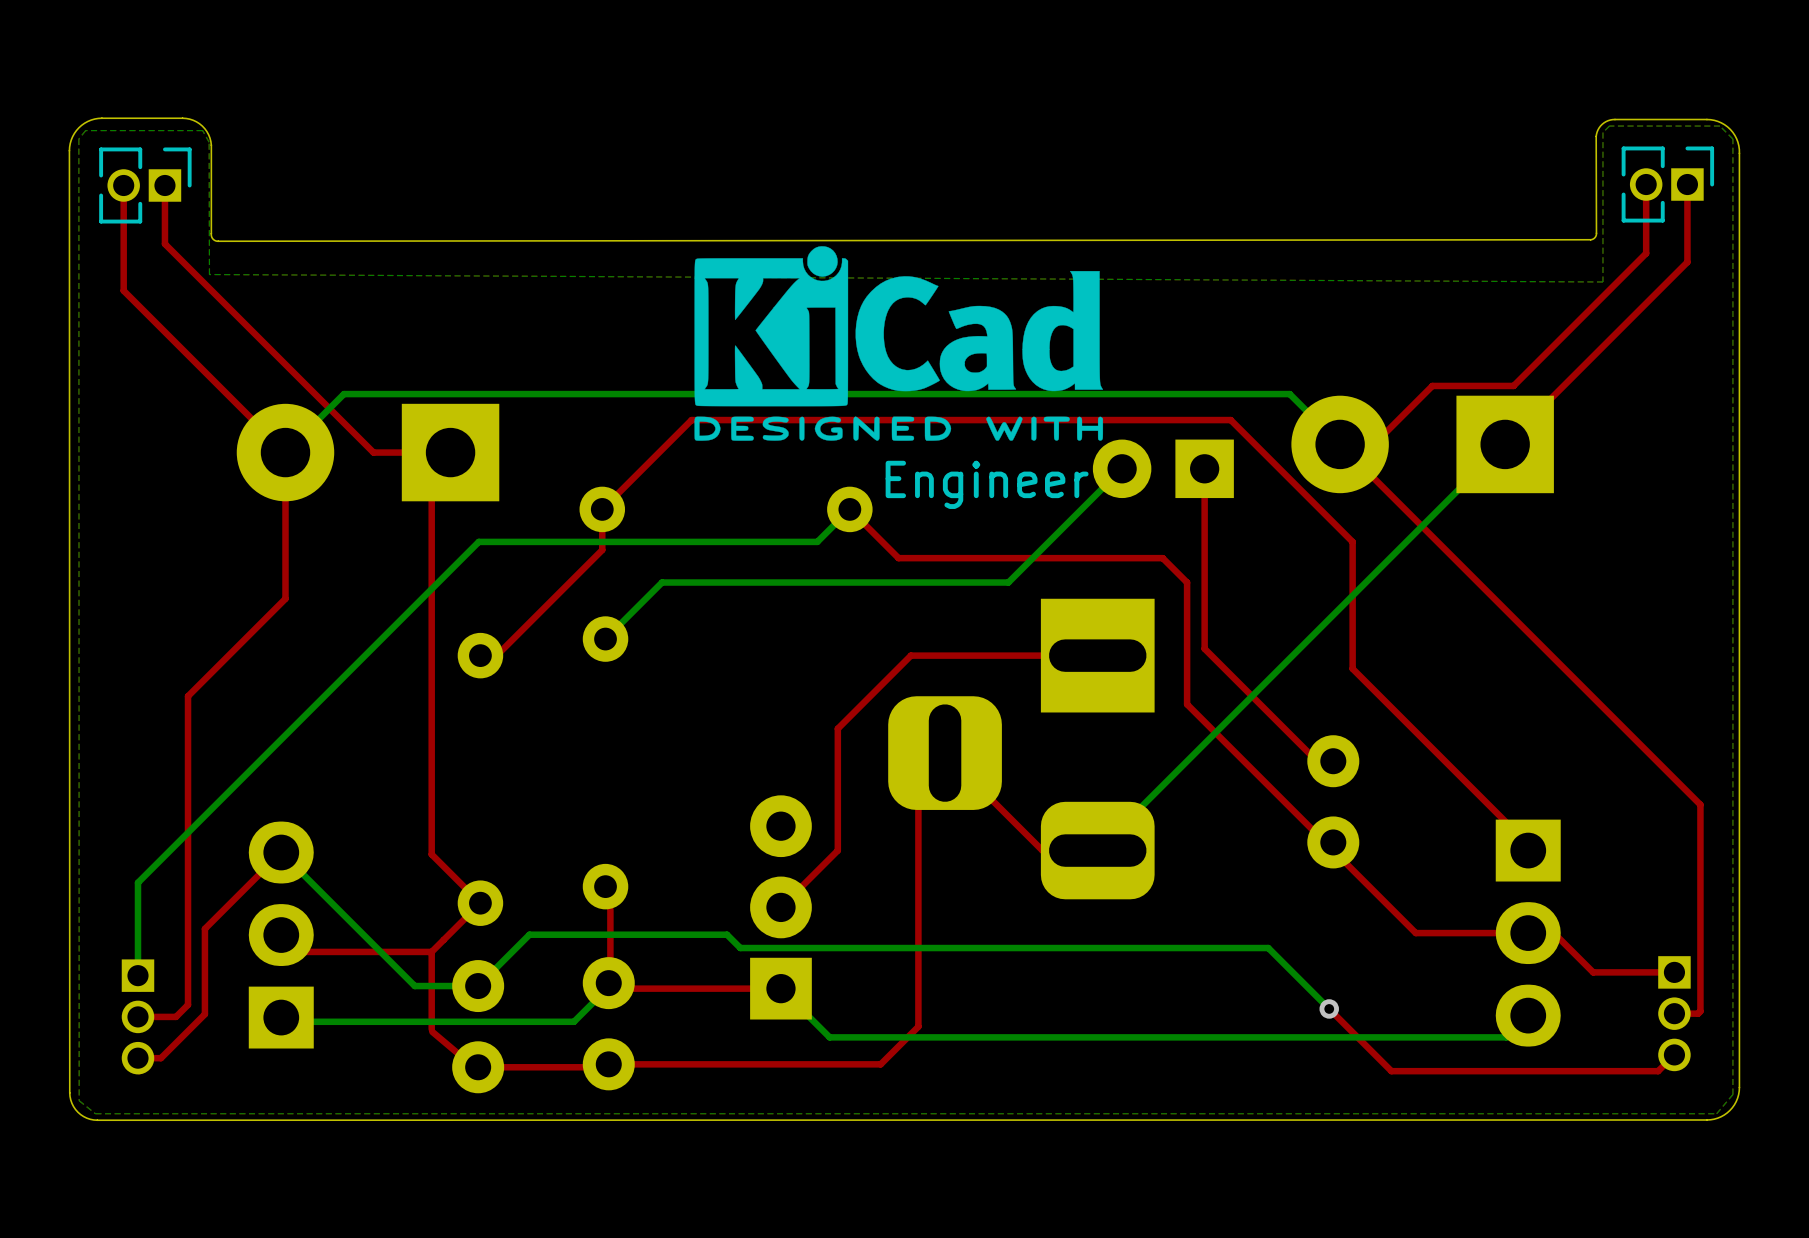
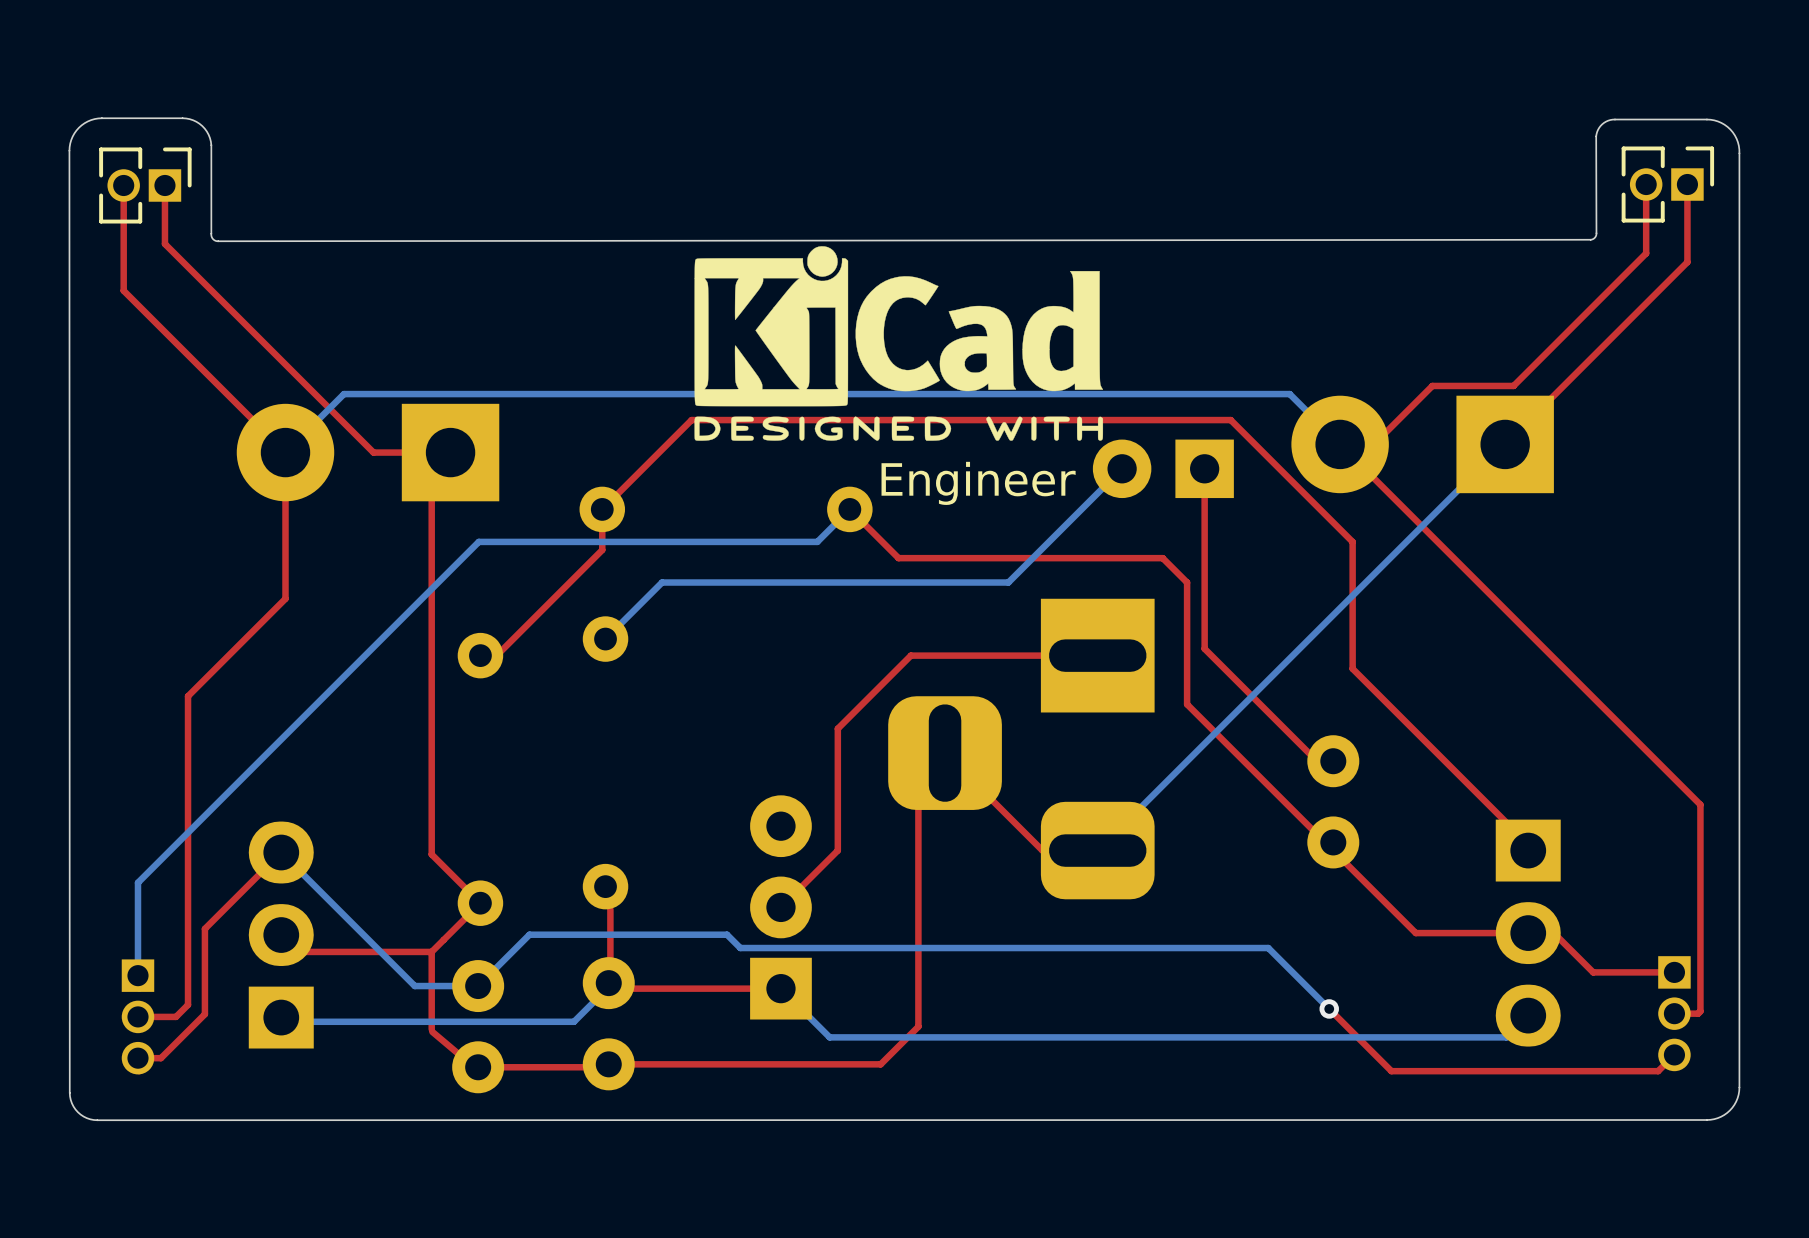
bottom zone outline: (1719, 126) (1732, 139) (1732, 1094) (1716, 1113) (95, 1113) (79, 1100) (78, 139) (85, 130) (202, 130) (209, 142) (209, 274) (1602, 281) (1602, 132) (1609, 126) (1719, 126) -> none

